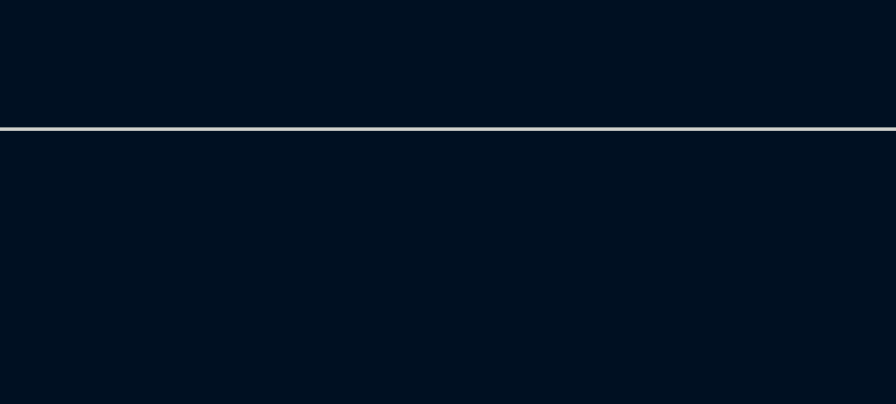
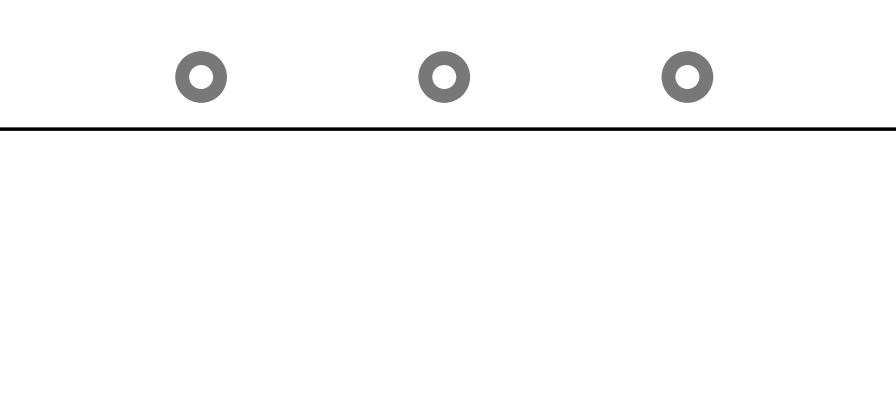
via: none -> (201, 77)
via: none -> (444, 77)
via: none -> (687, 77)

